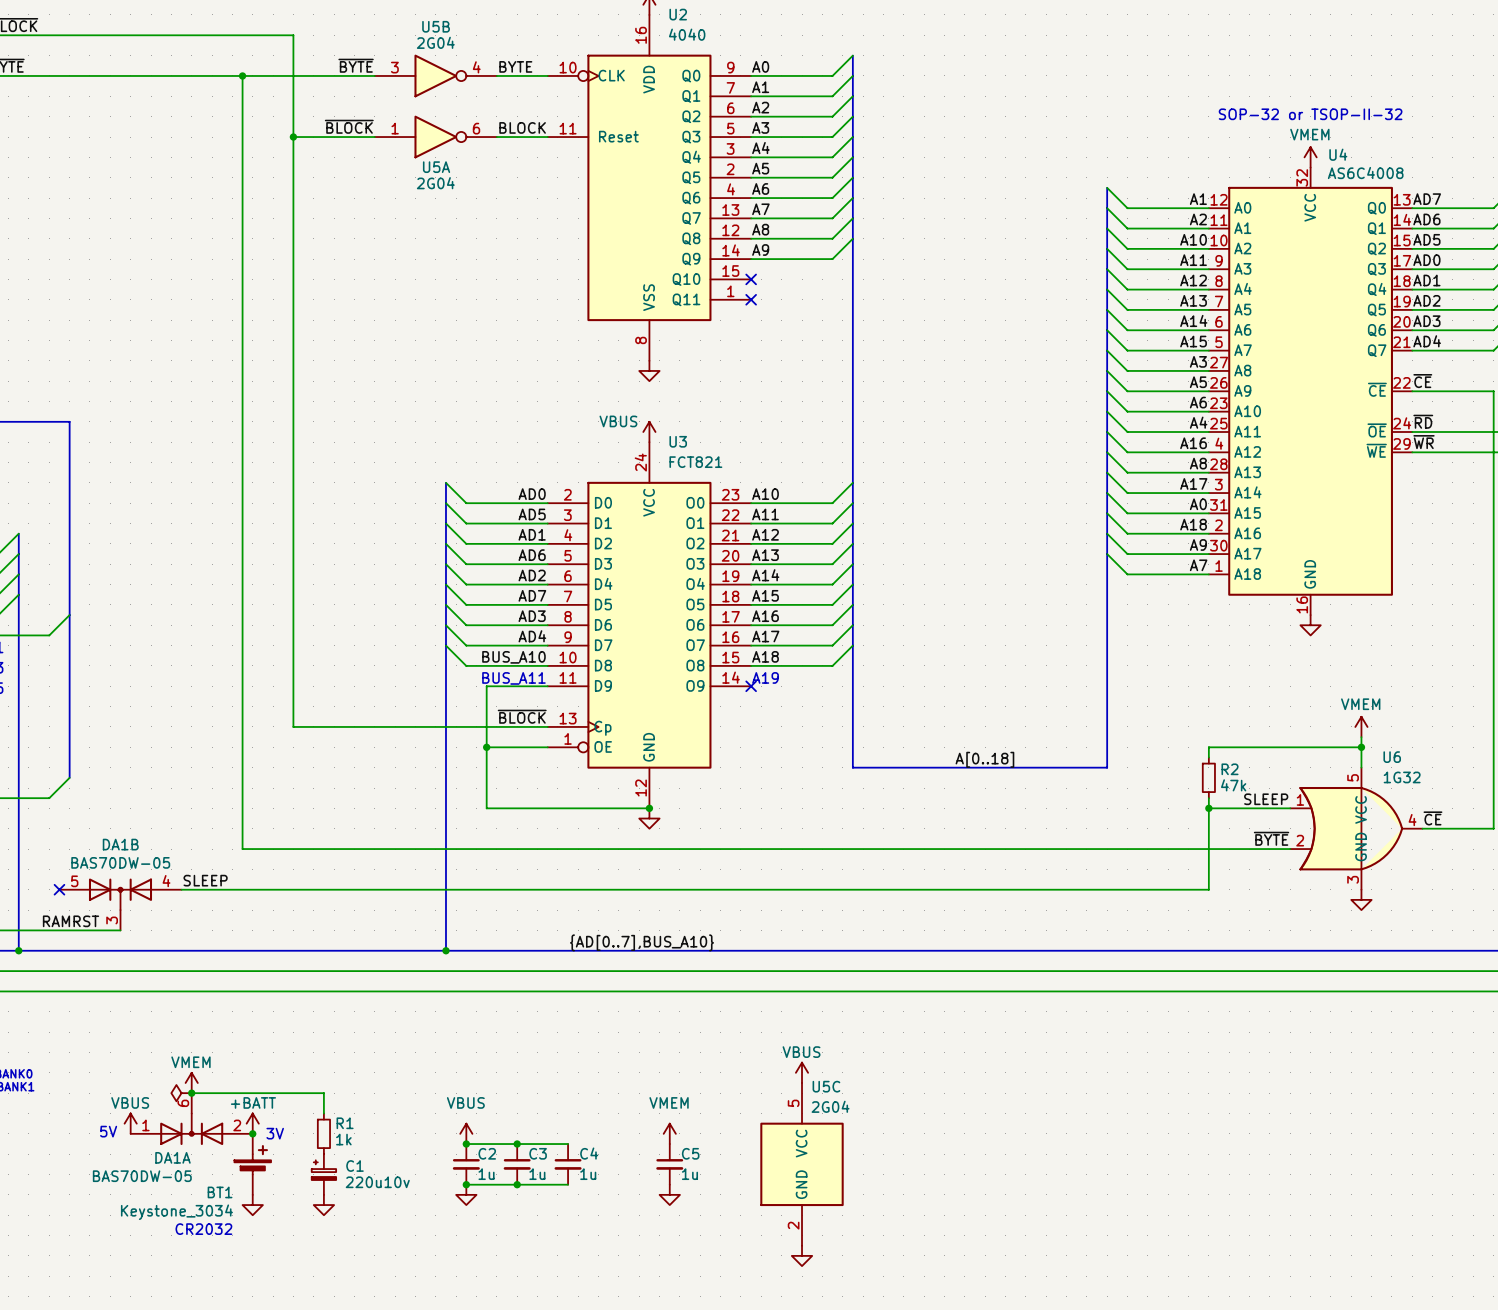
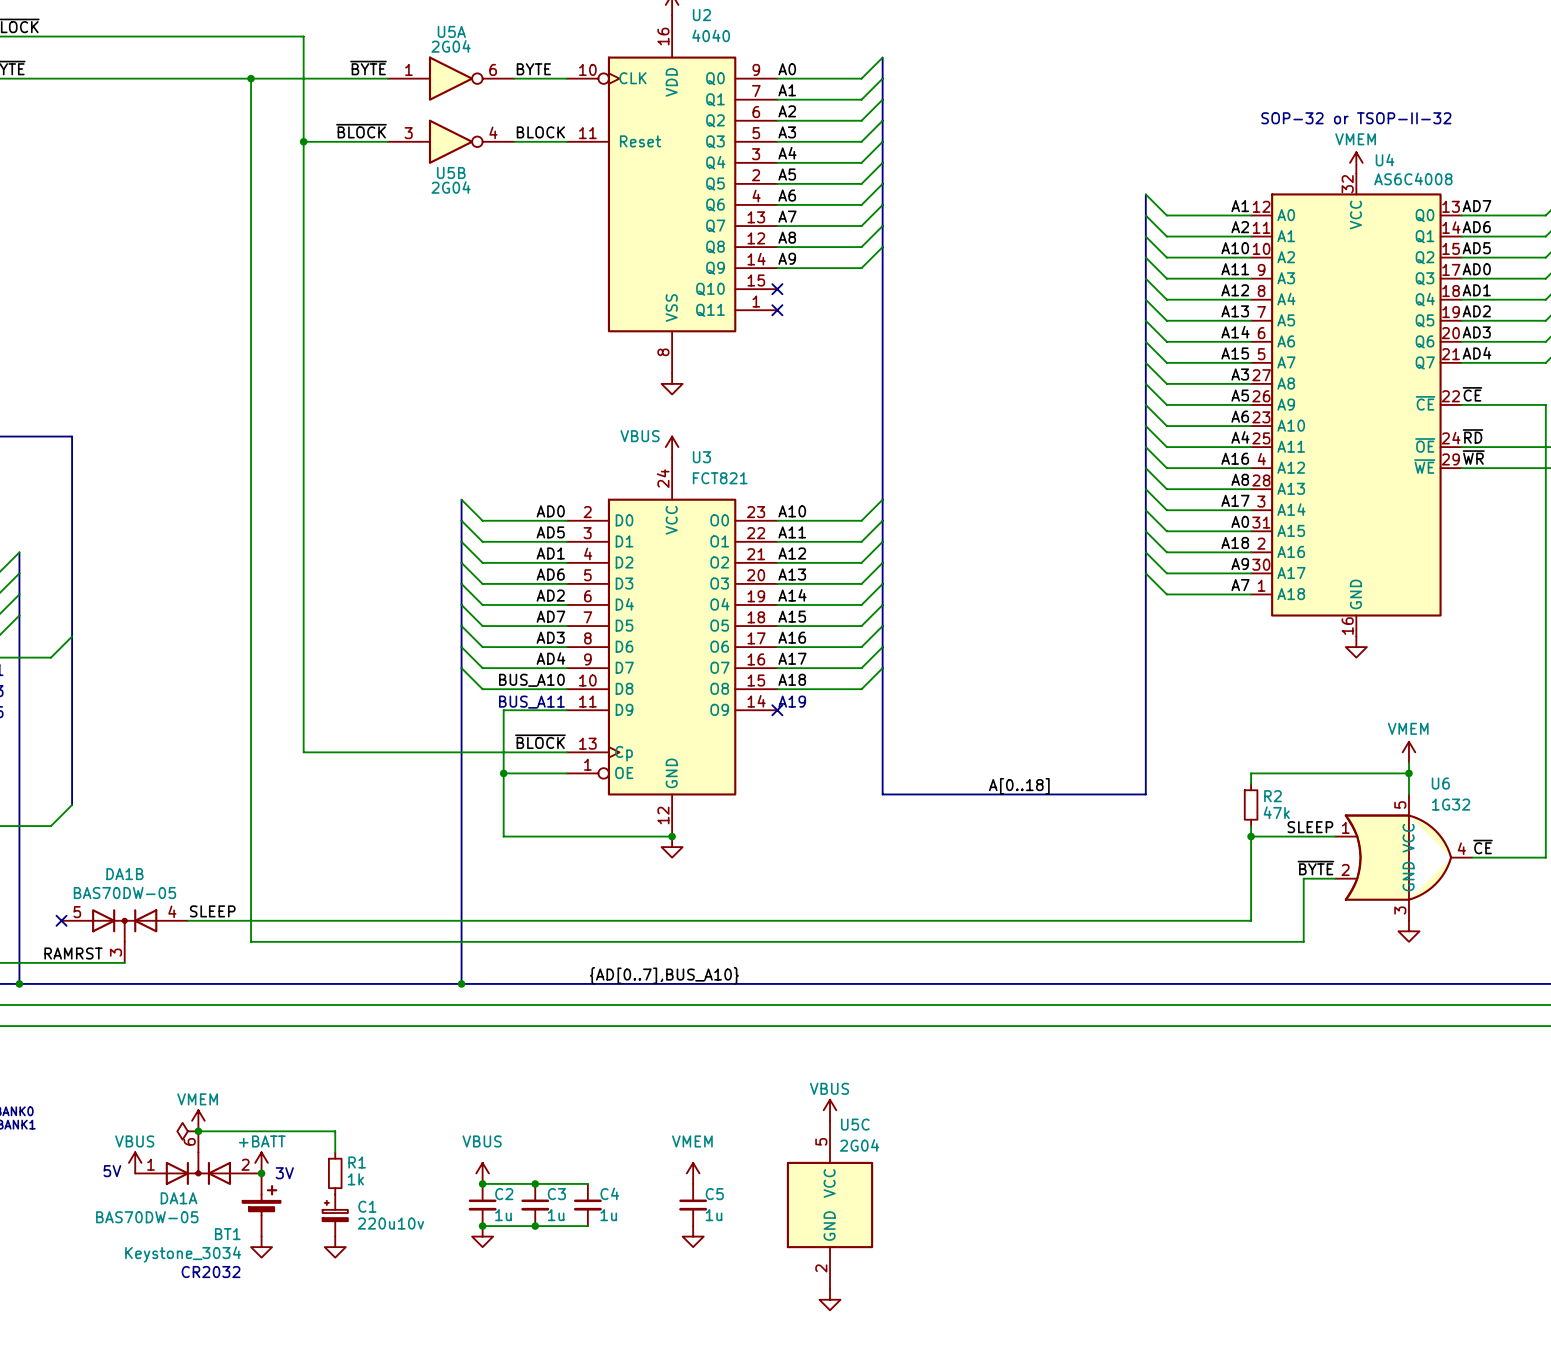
U5B name position: U5B (436, 26) -> U5B (451, 172)
U5B value position: 2G04 (435, 42) -> 2G04 (451, 187)
U5B position: (435, 75) -> (451, 141)
U5A position: (435, 137) -> (451, 78)
U5A name position: U5A (436, 167) -> U5A (451, 31)
U5A value position: 2G04 (435, 183) -> 2G04 (451, 46)
wire: (242, 849) (1259, 849) -> (251, 878) (251, 941) (1303, 941) (1303, 878)

